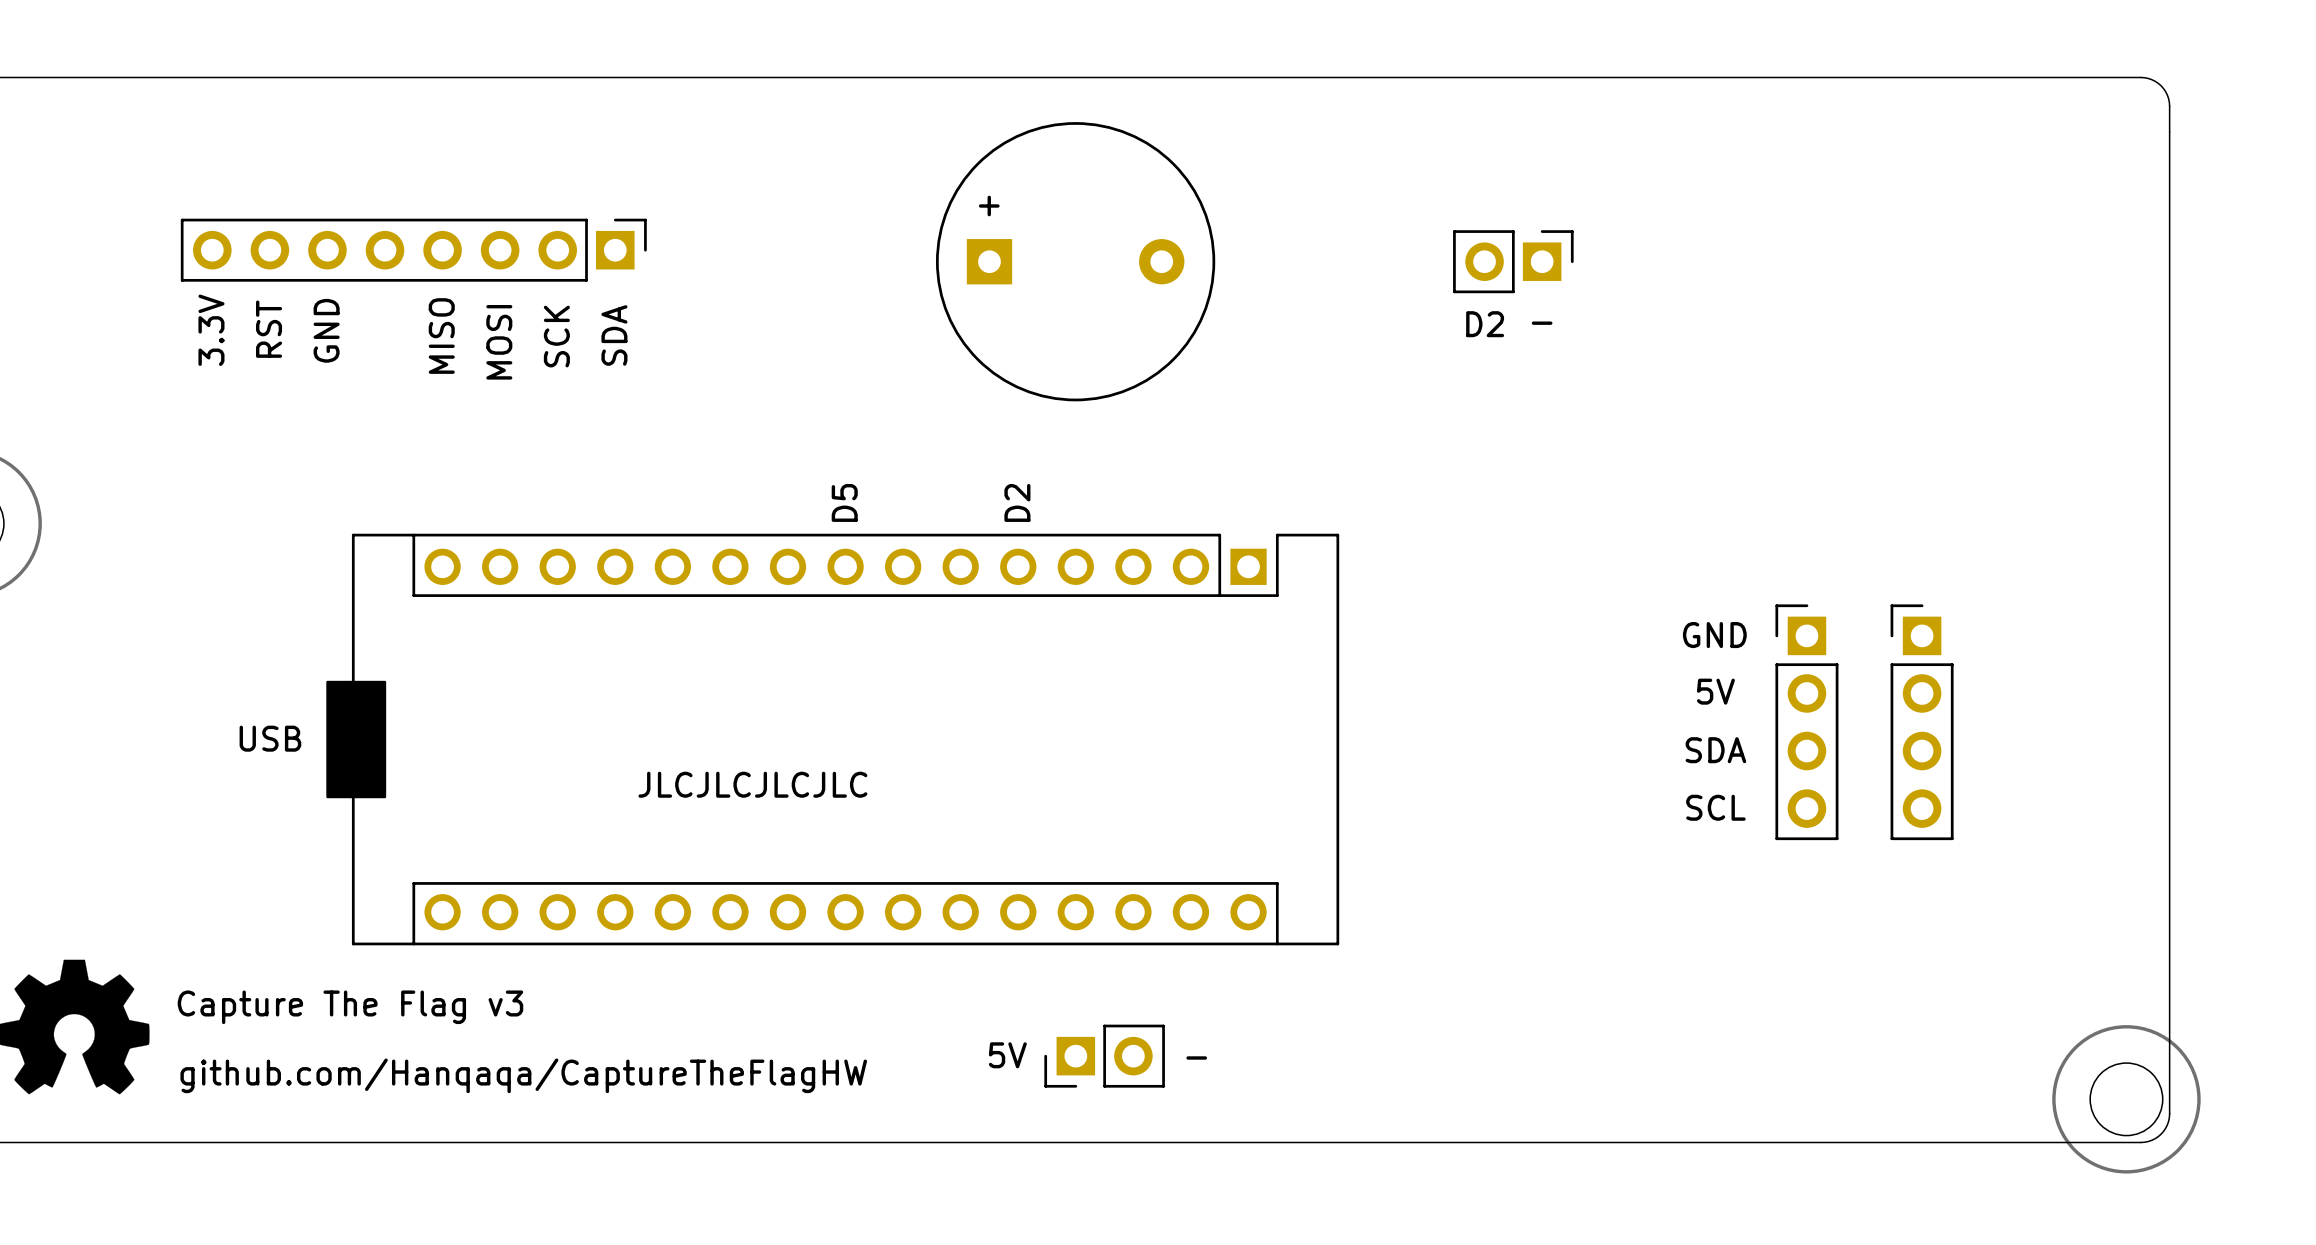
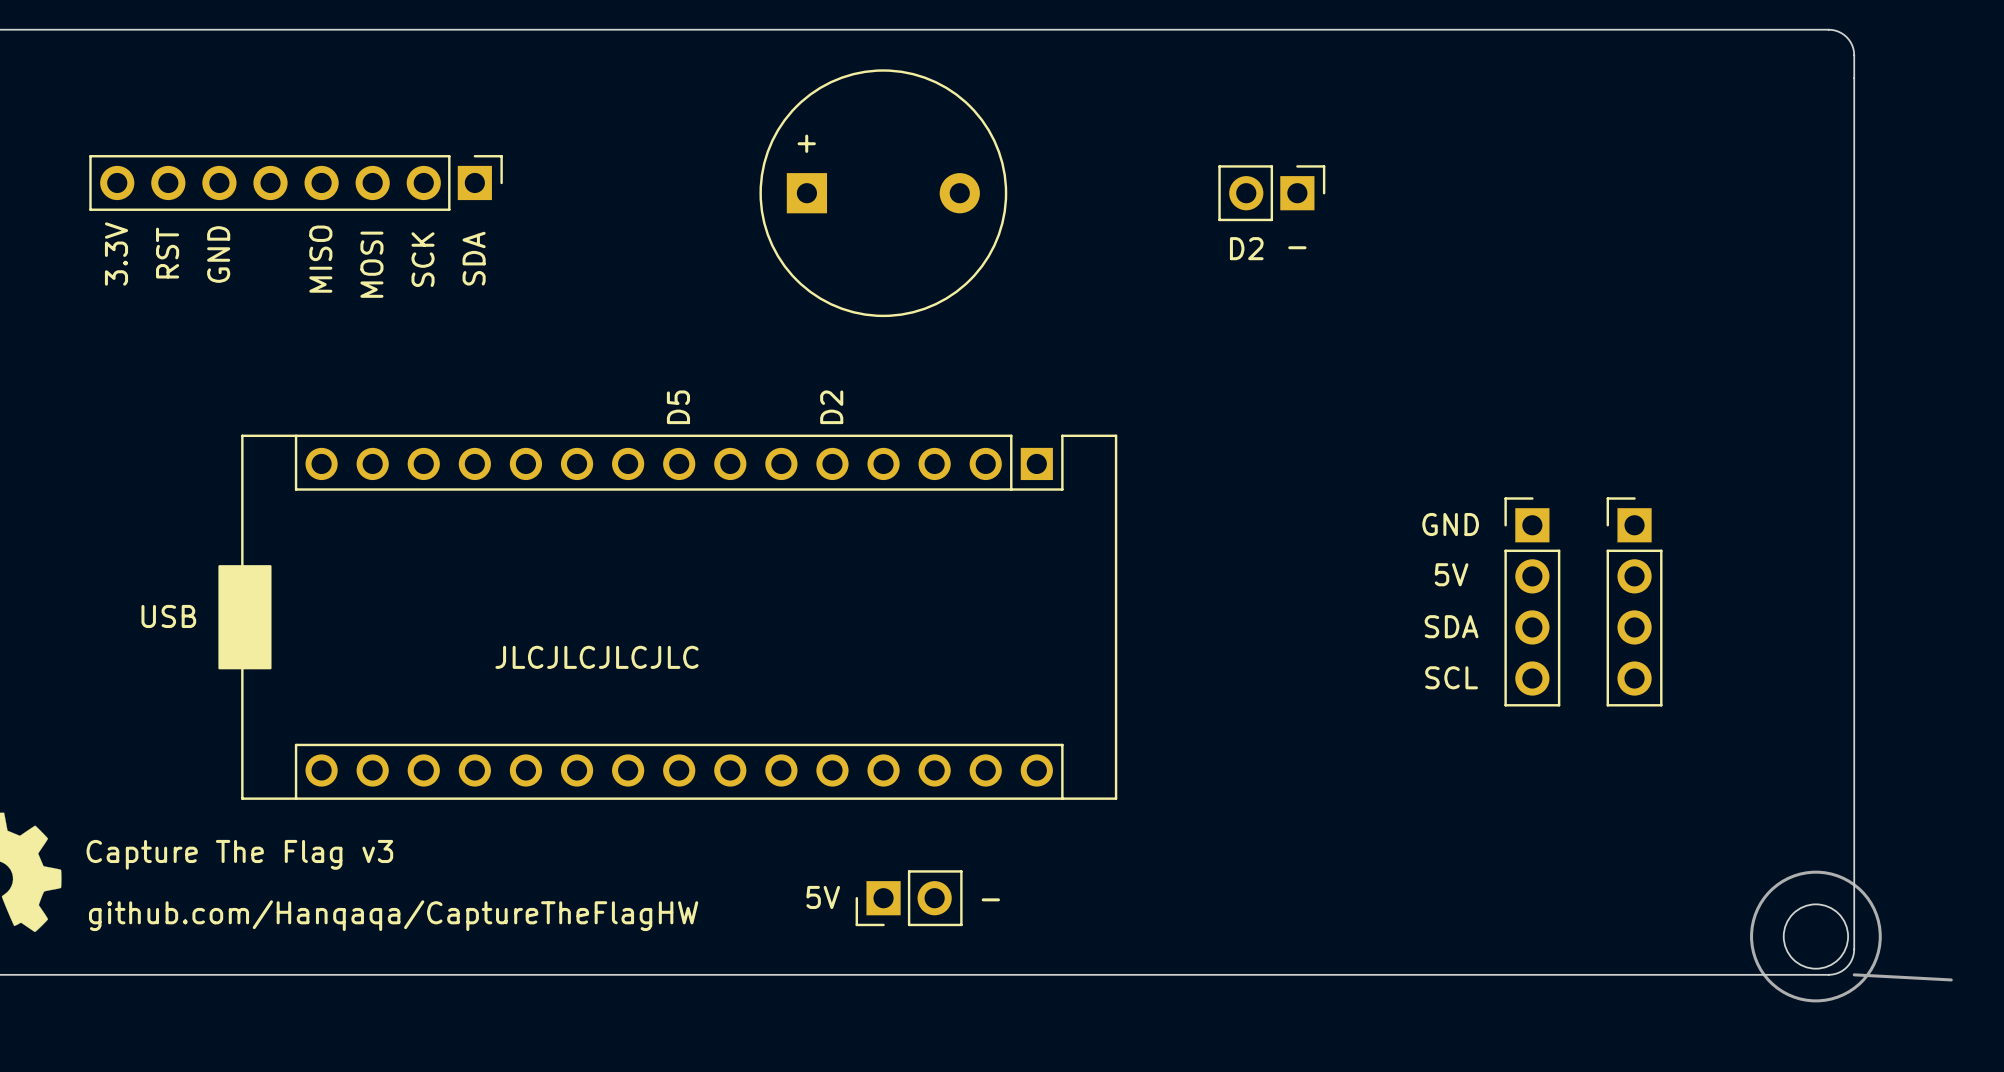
line: none -> (1854, 974) (1951, 979)

